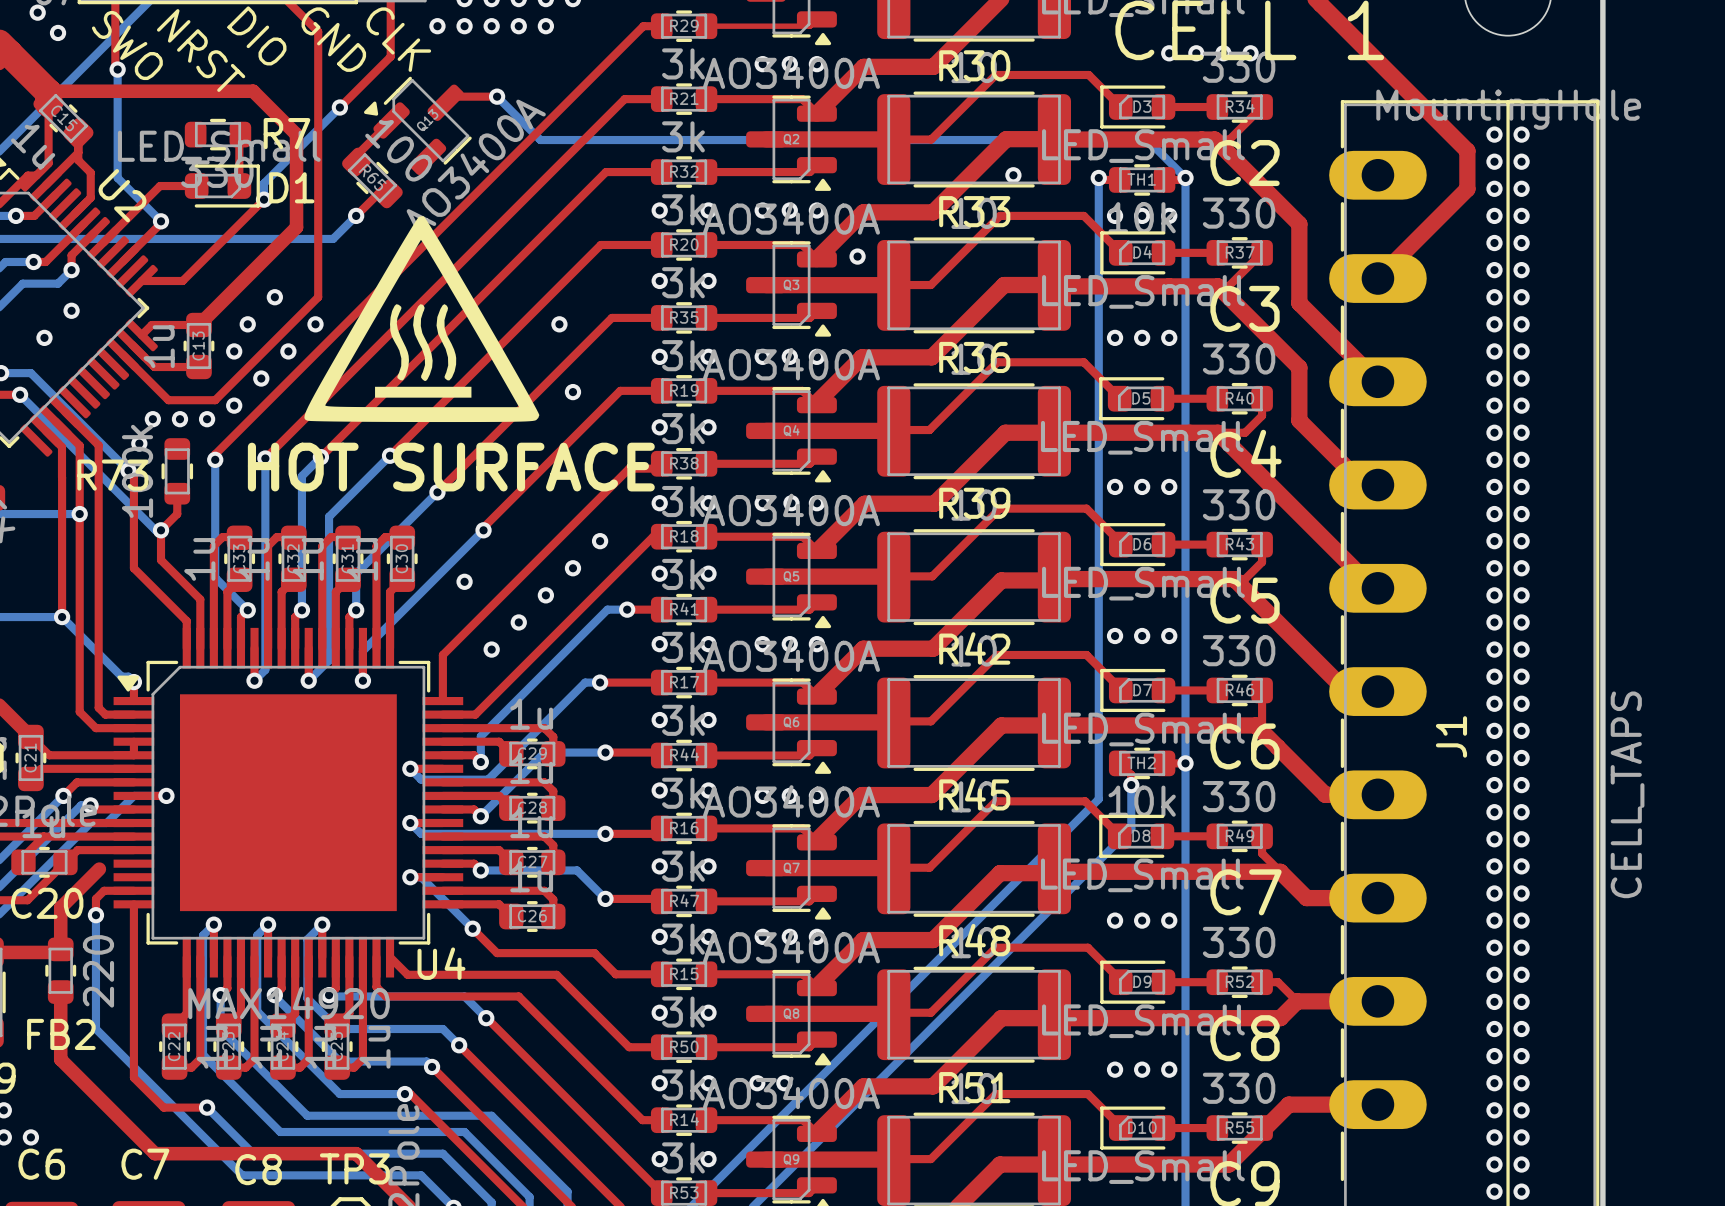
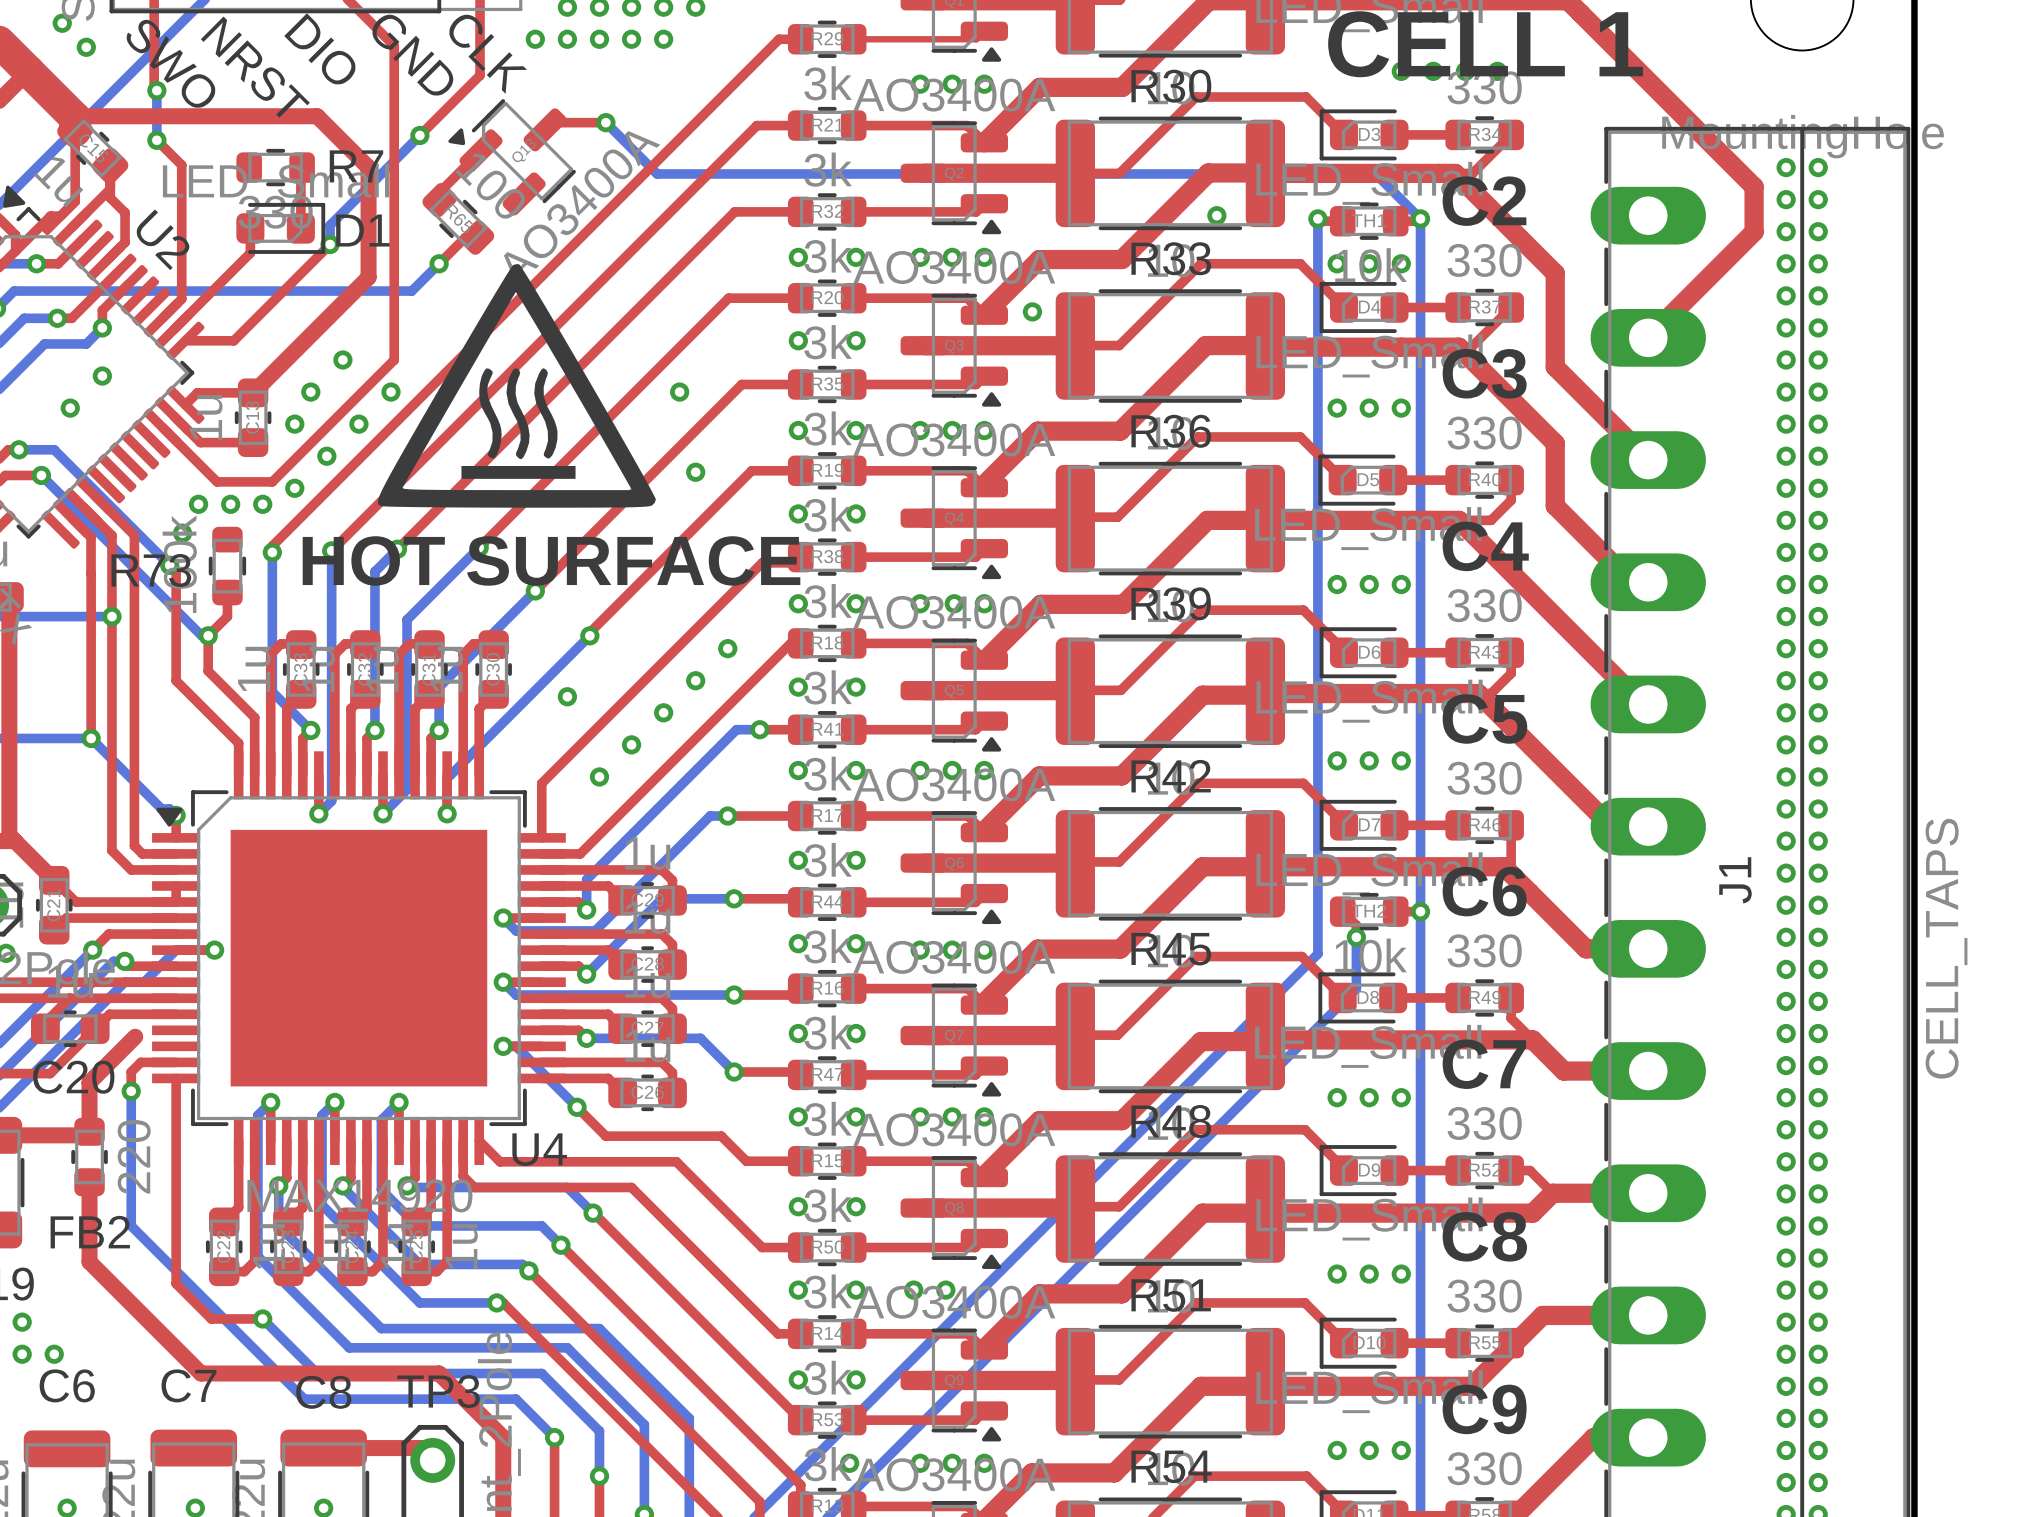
bottom track: (117, 111) (117, 177) (161, 221) -> none
top track: (196, 186) (160, 186) (103, 242) -> (250, 228) (250, 253) (174, 329)
top track: (161, 221) (138, 245) -> (156, 140) (181, 165) (181, 299)
via position: (161, 221) -> (156, 140)

